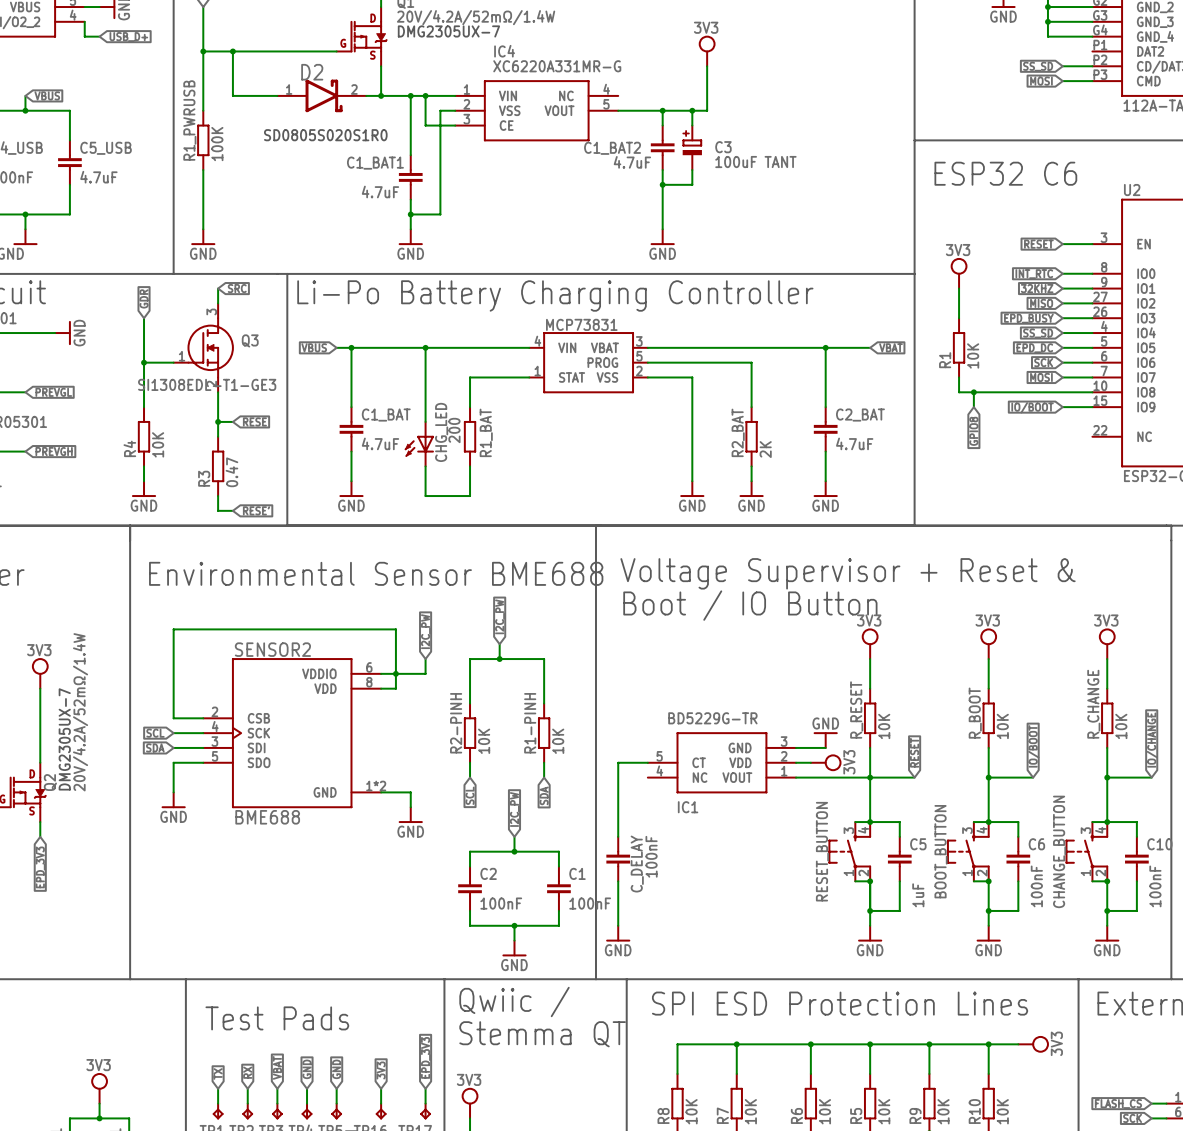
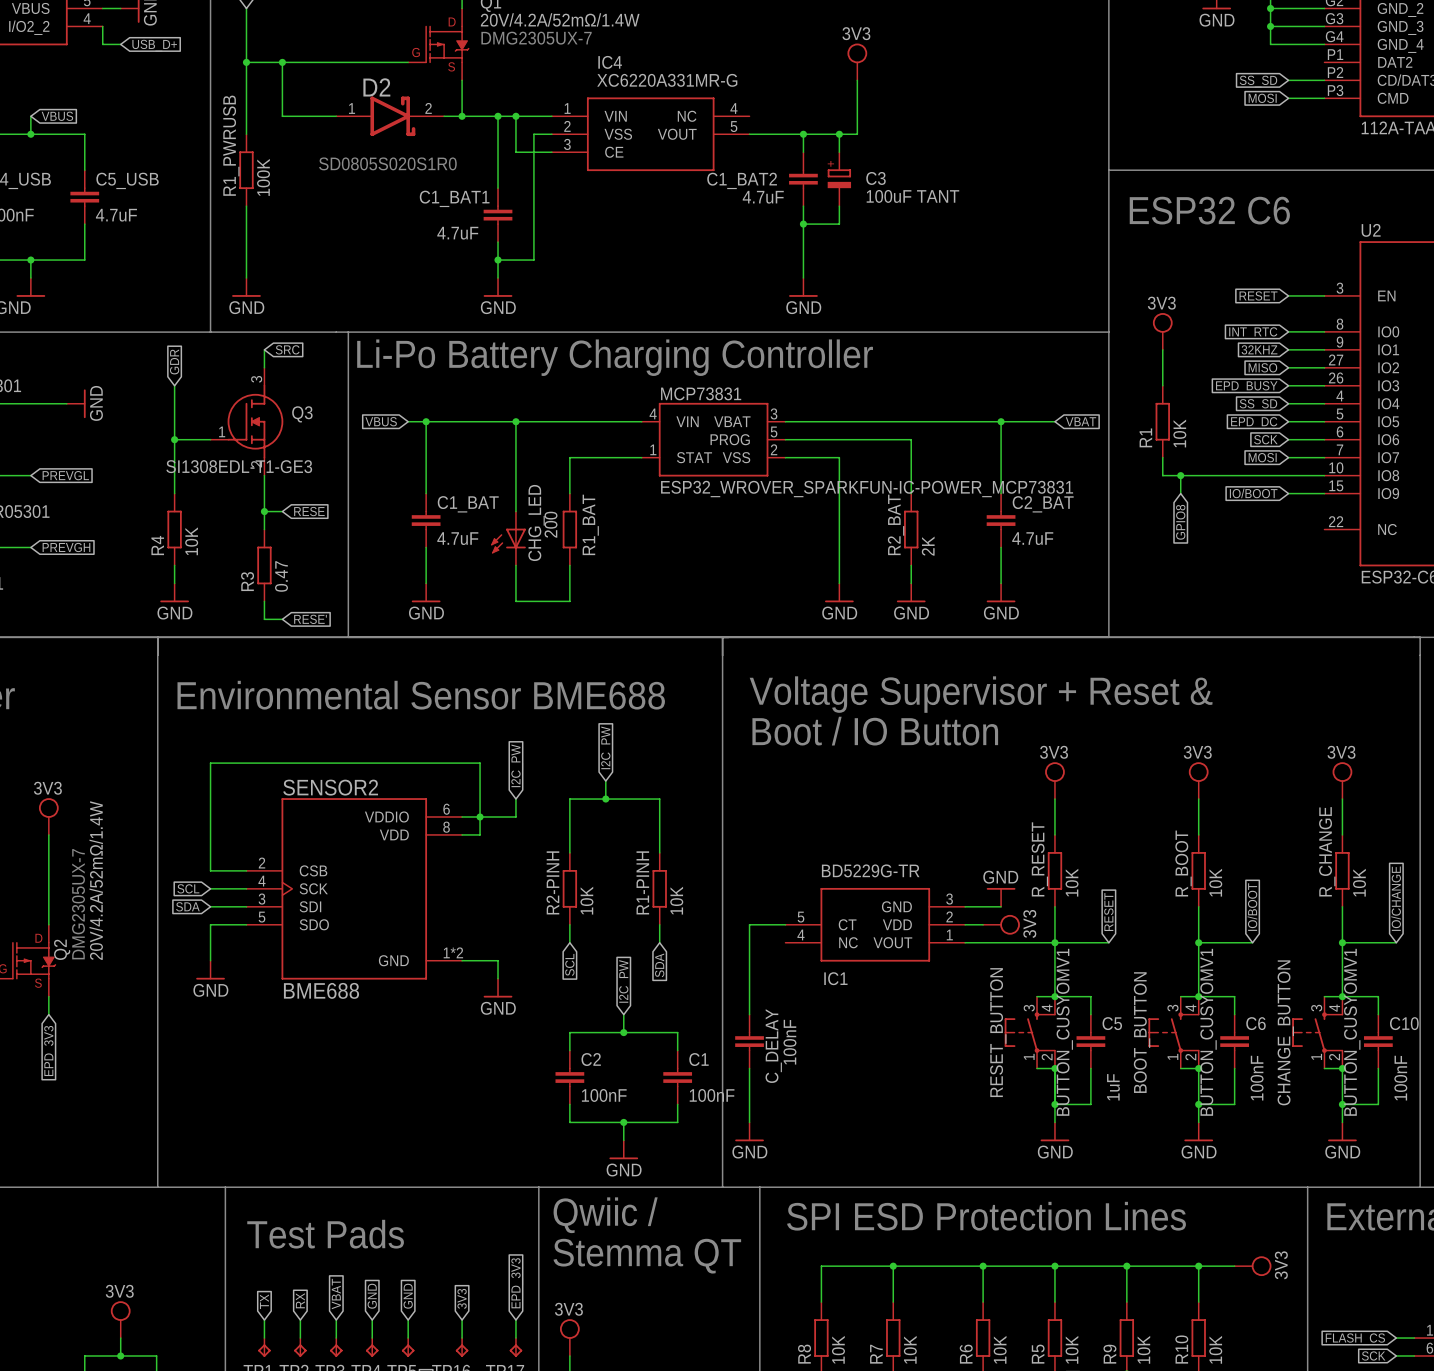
MCP73831 value: none -> ESP32_WROVER_SPARKFUN-IC-POWER_MCP73831 (867, 489)
RESET_BUTTON value: none -> BUTTON_CUSYOMV1 (1064, 1032)
BOOT_BUTTON value: none -> BUTTON_CUSYOMV1 (1208, 1032)
CHANGE_BUTTON value: none -> BUTTON_CUSYOMV1 (1352, 1032)

